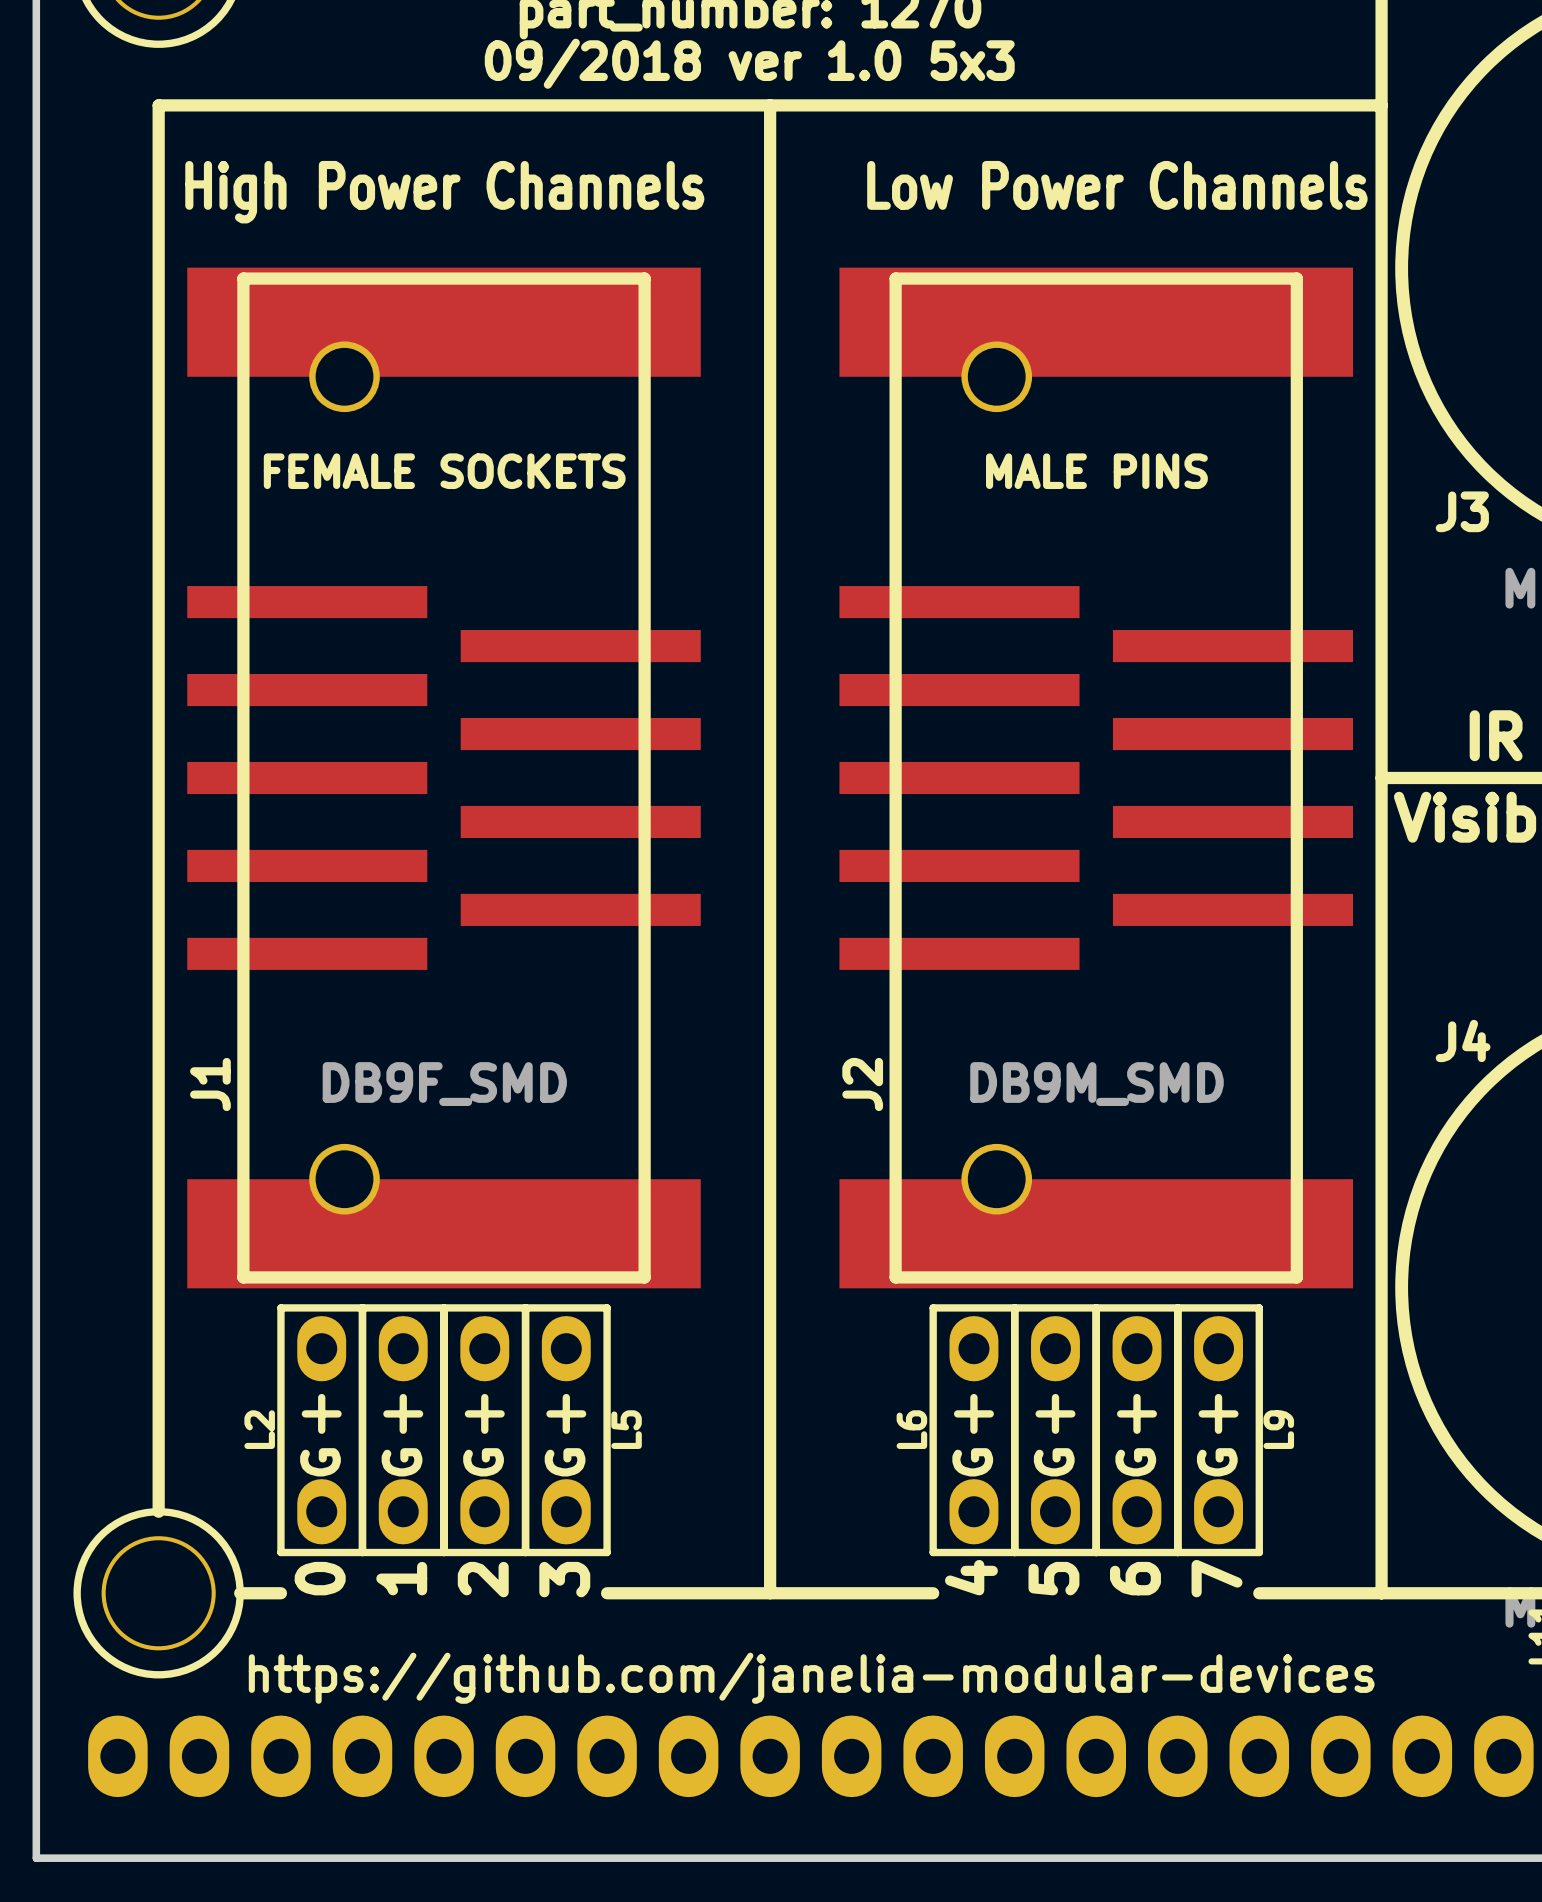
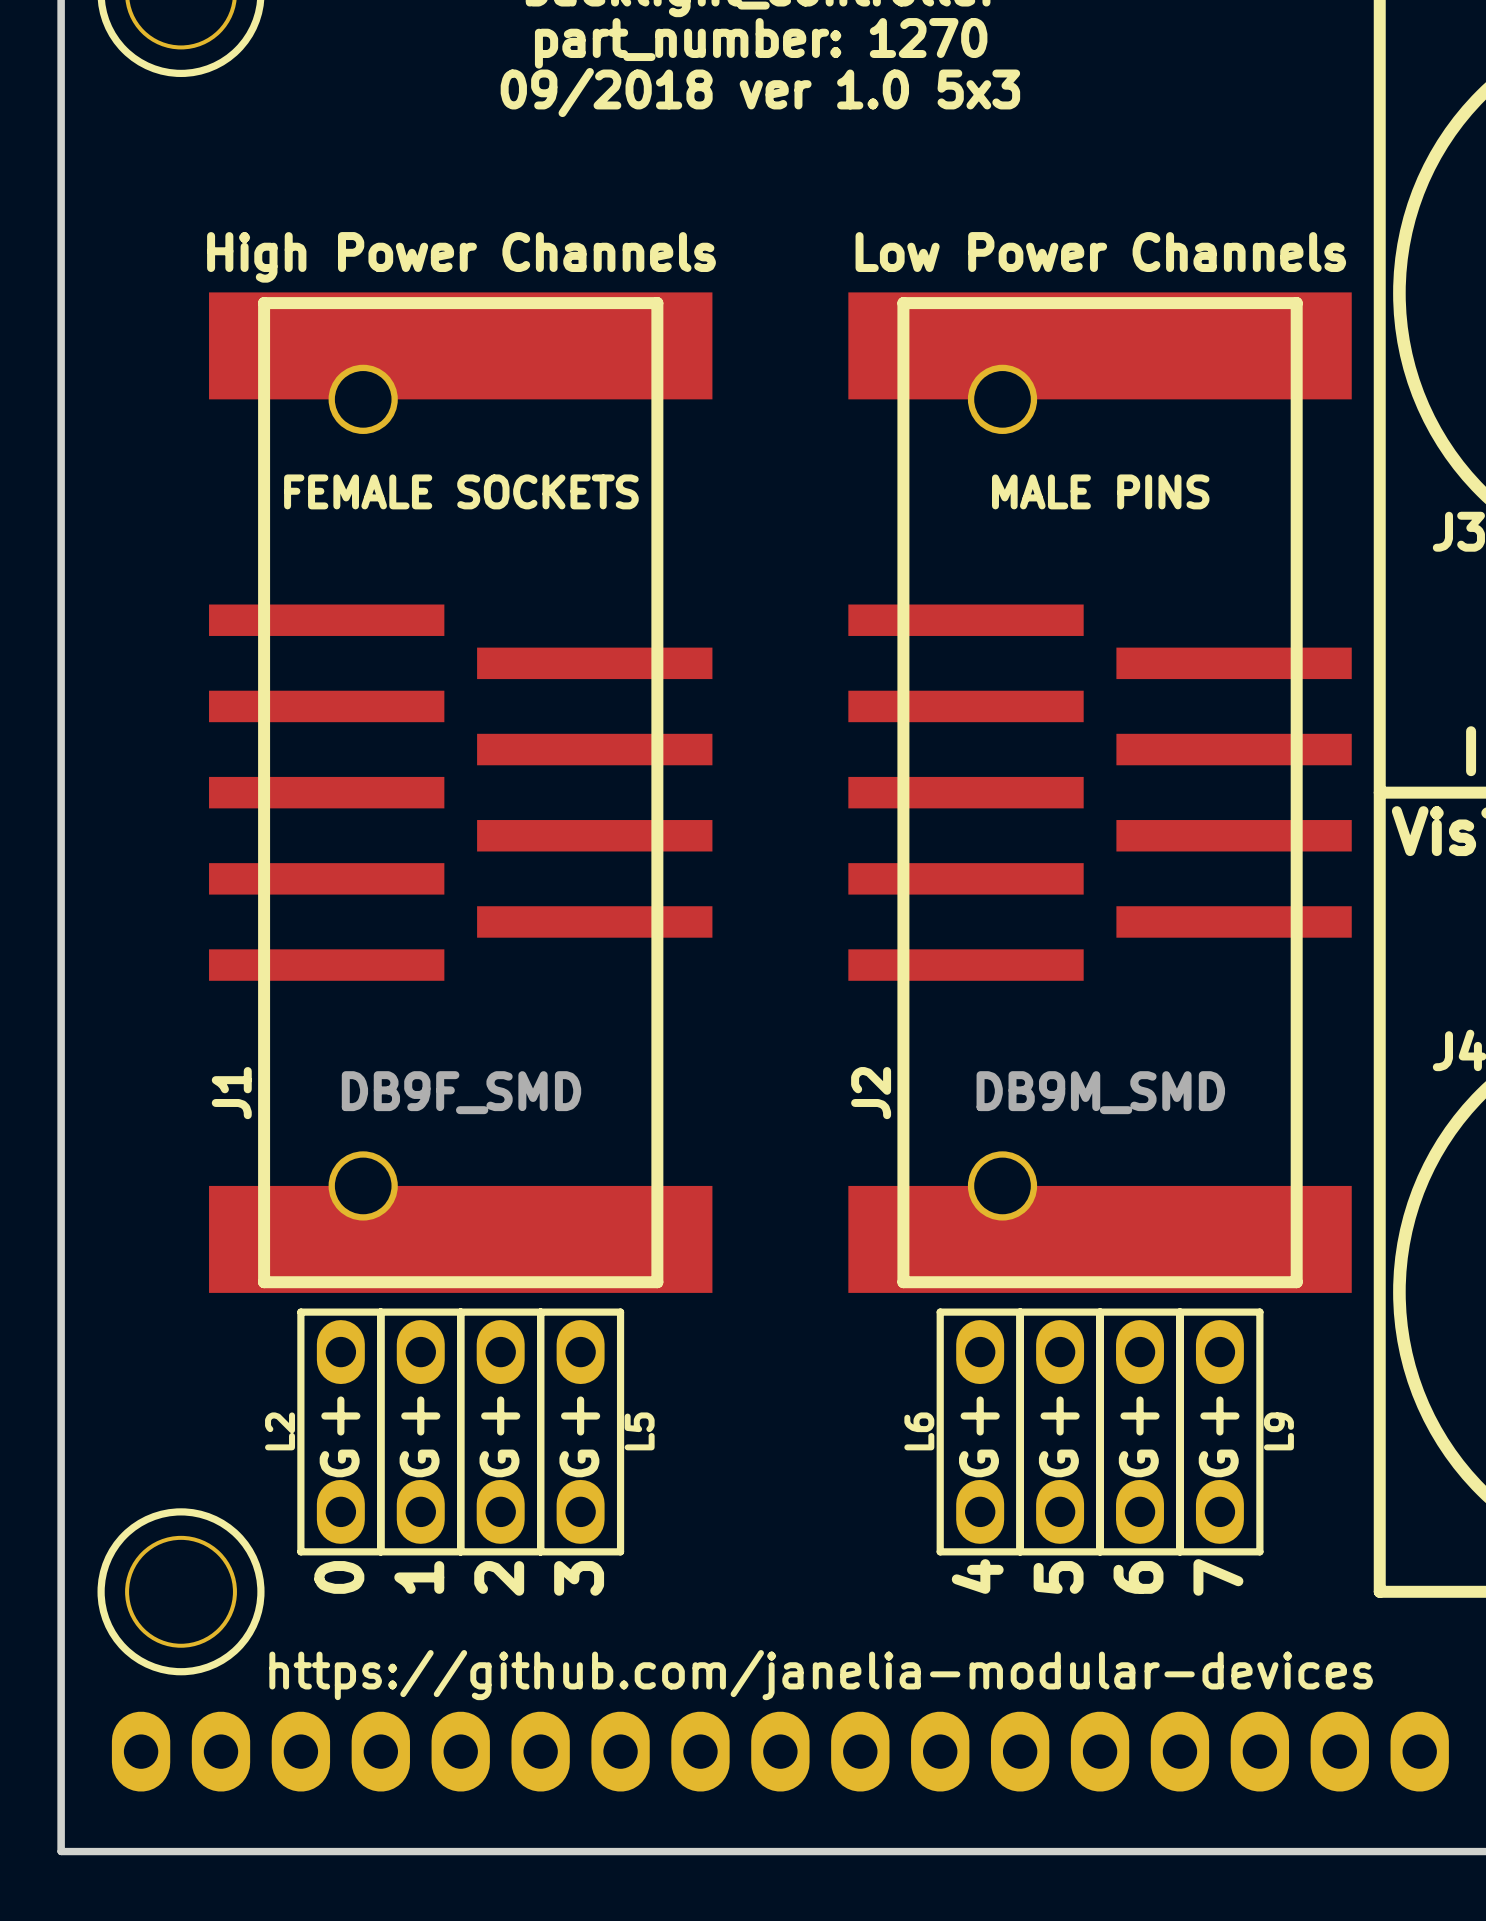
line: (770, 105) (770, 1593) -> none
line: (1381, 105) (158, 105) (158, 1511) -> none
text position: Low Power Channels (1117, 185) -> Low Power Channels (1100, 252)
text position: High Power Channels (444, 192) -> High Power Channels (461, 257)
line: (240, 1593) (280, 1593) -> none
line: (607, 1593) (933, 1593) -> none
line: (1259, 1593) (1381, 1593) -> none

